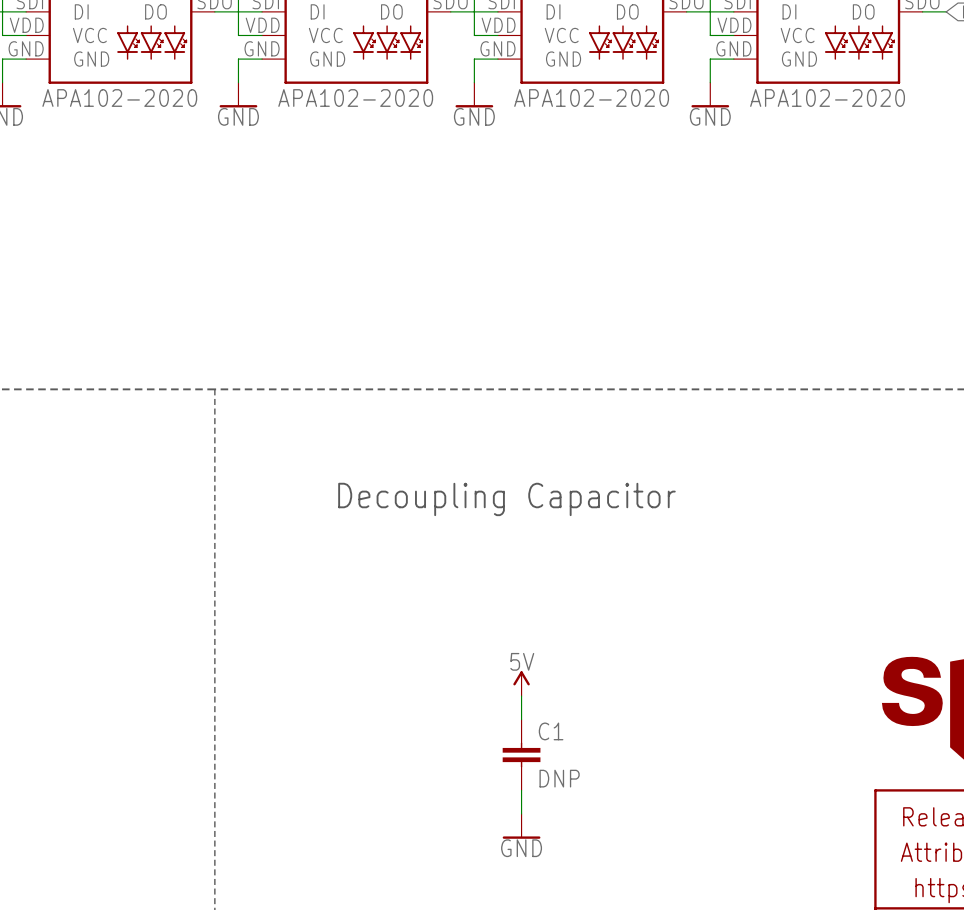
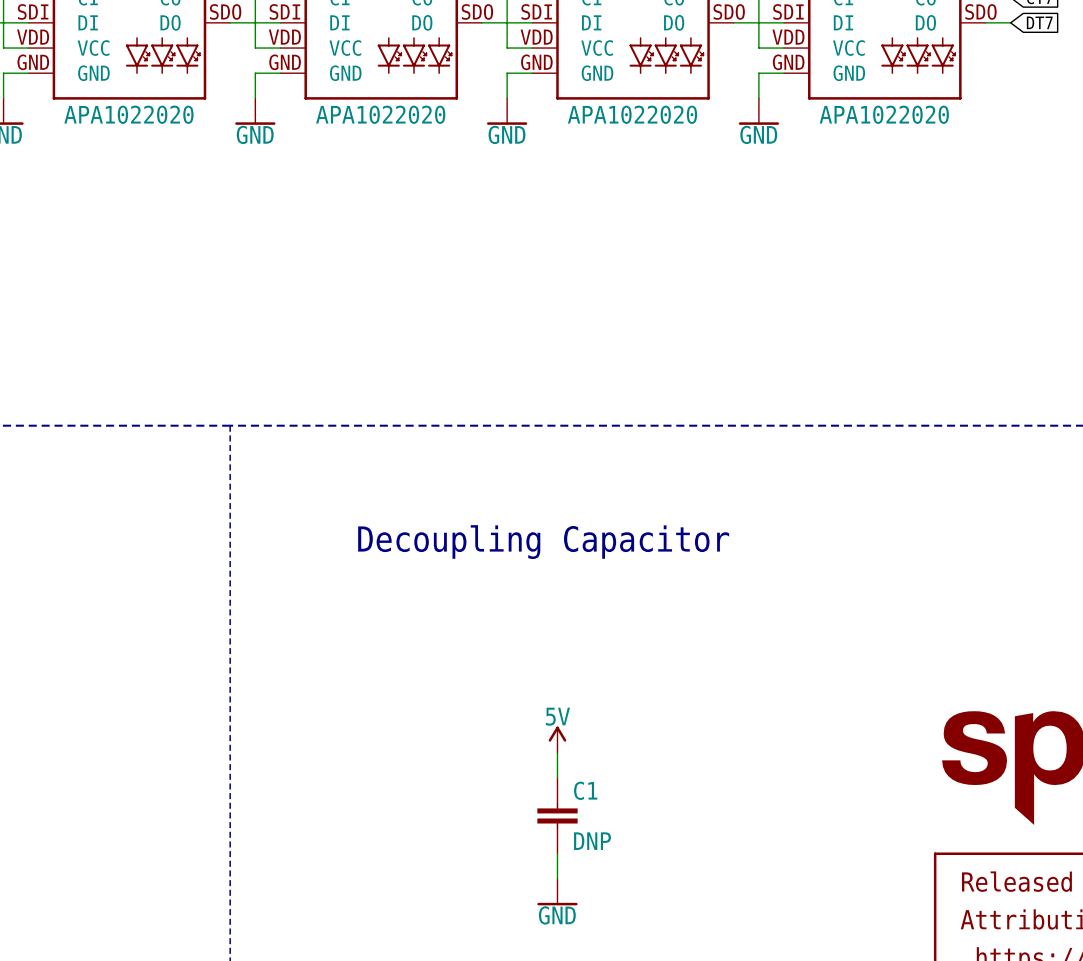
part value: APA102-2020 (119, 98) -> APA1022020 (128, 114)
part value: APA102-2020 (355, 98) -> APA1022020 (380, 114)
part value: APA102-2020 (591, 98) -> APA1022020 (632, 114)
part value: APA102-2020 (827, 98) -> APA1022020 (884, 114)

